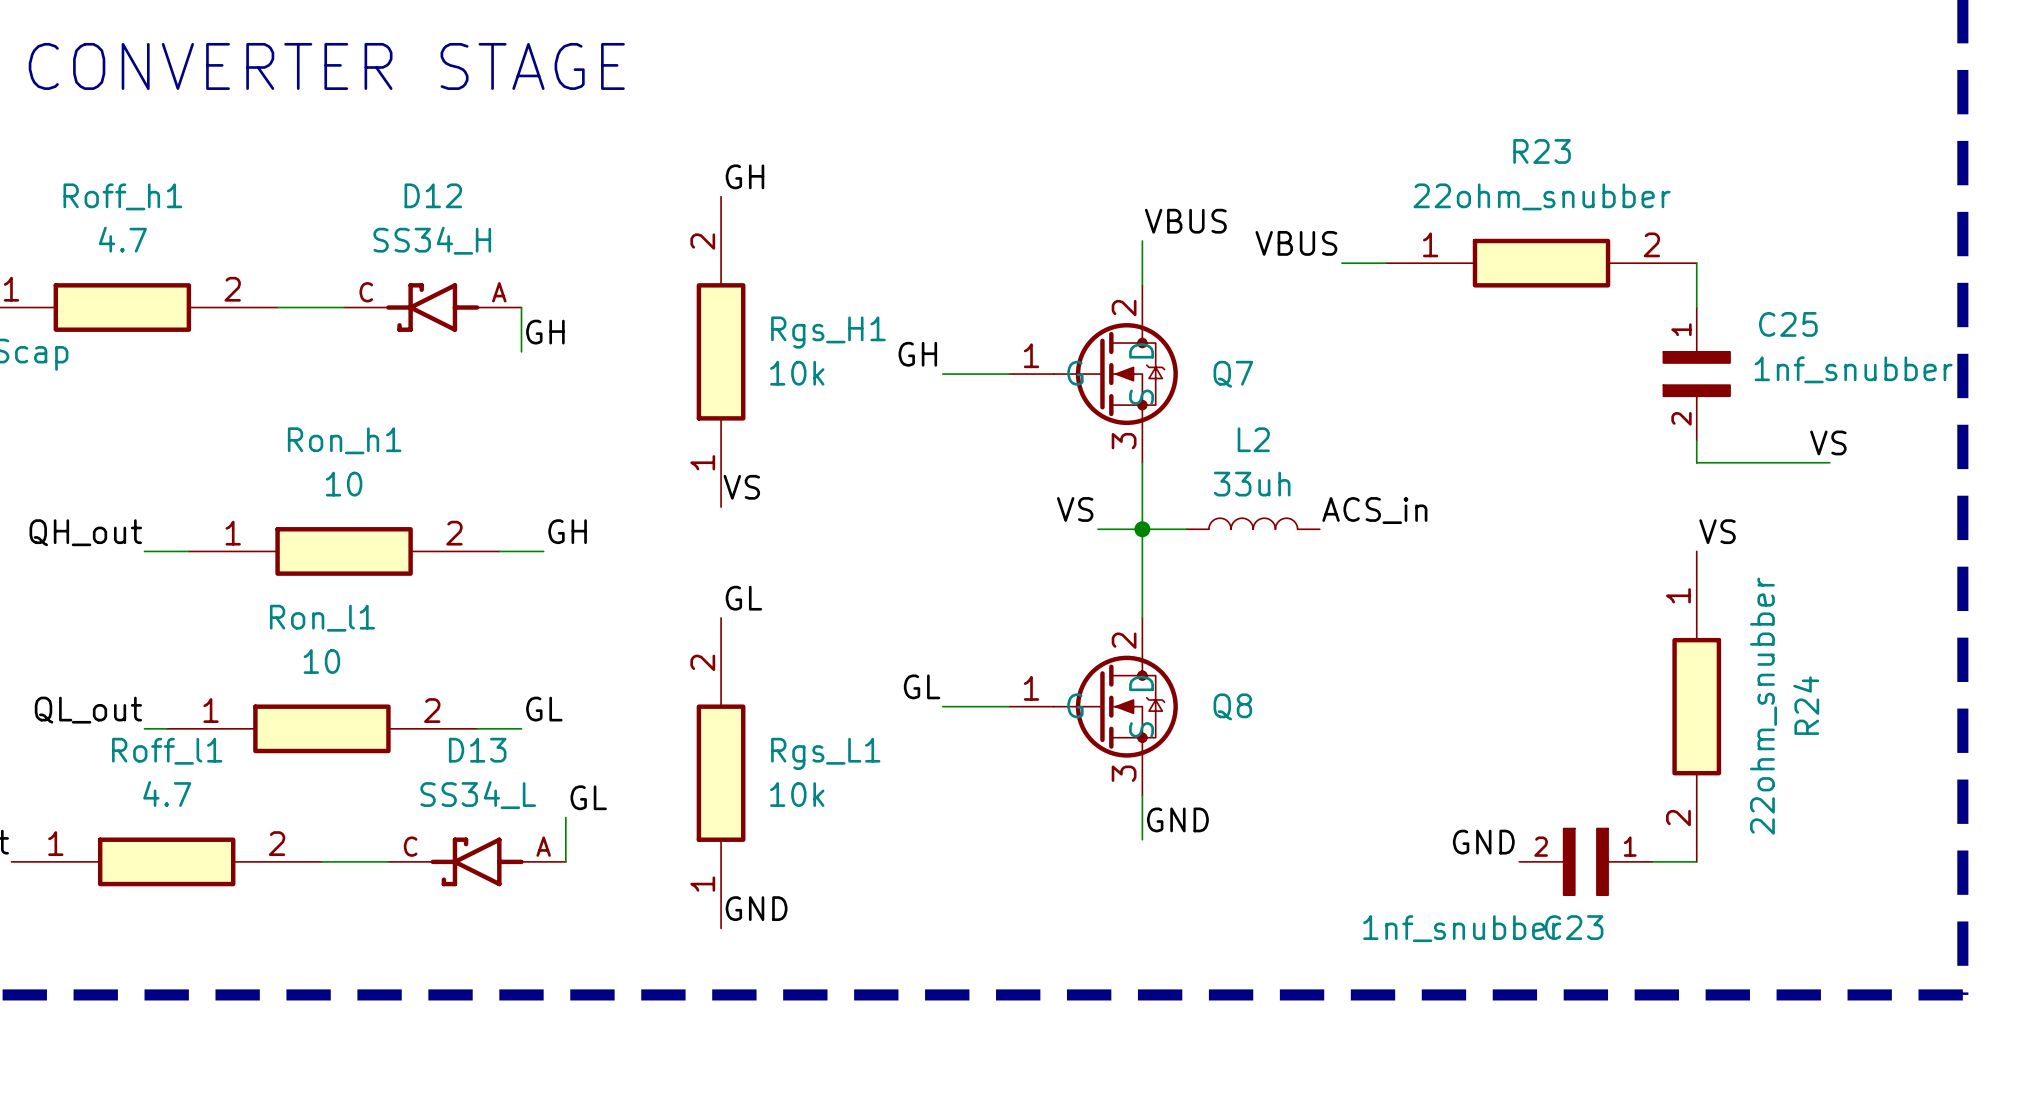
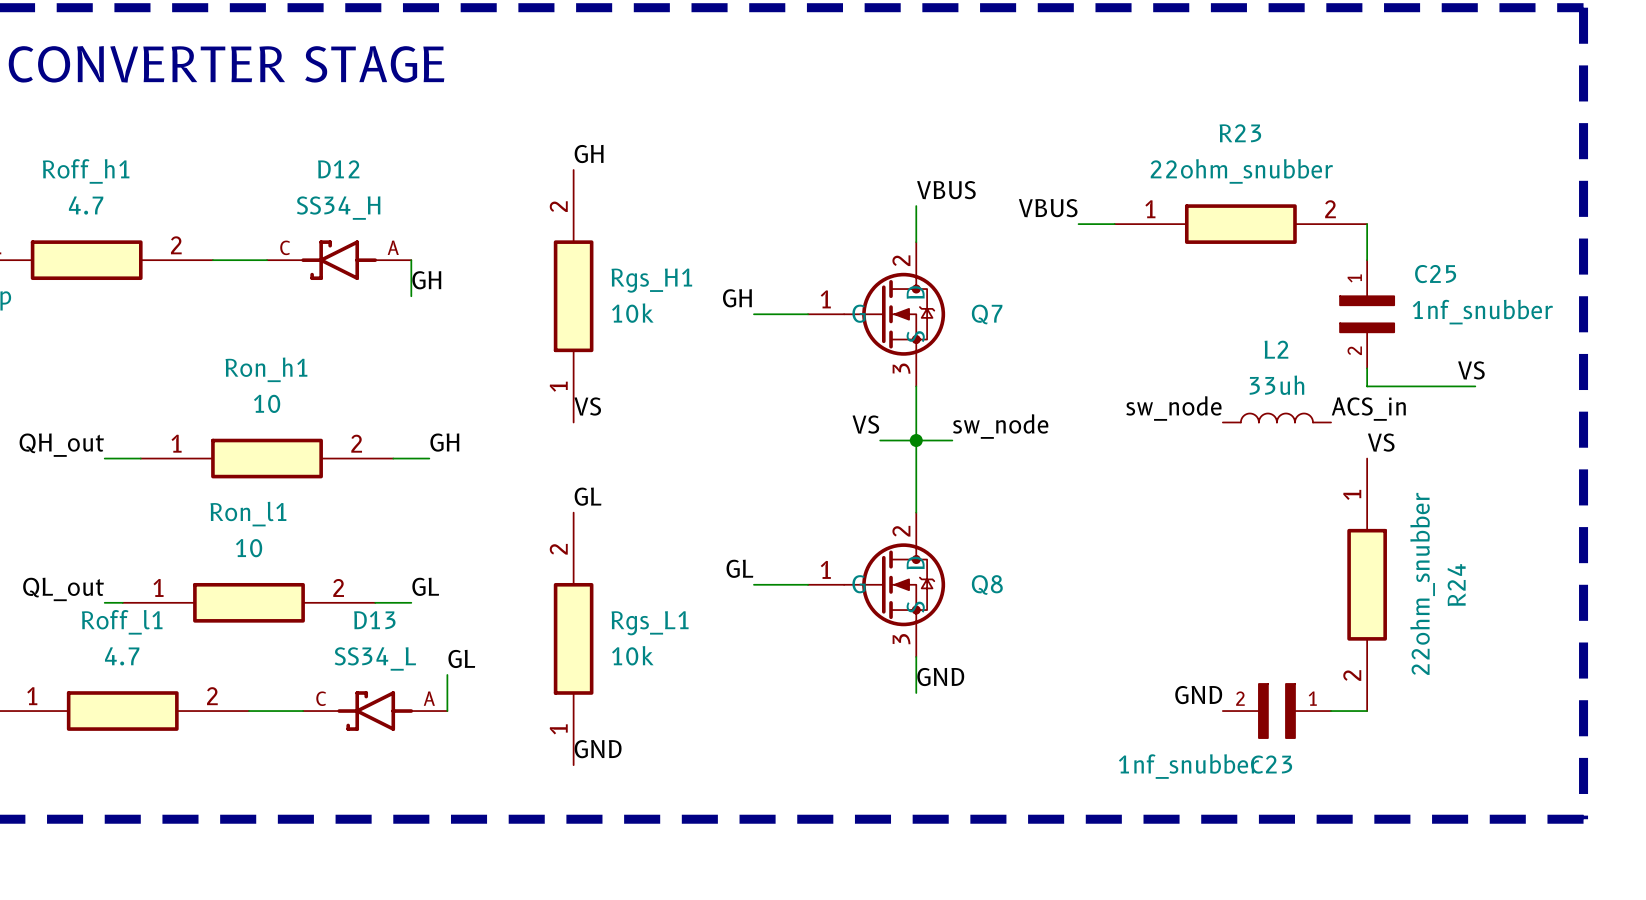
label: none -> sw_node (1173, 408)
label: none -> sw_node (1000, 426)
label position: ACS_in (1374, 510) -> ACS_in (1368, 409)
L2 position: (1253, 523) -> (1276, 417)

